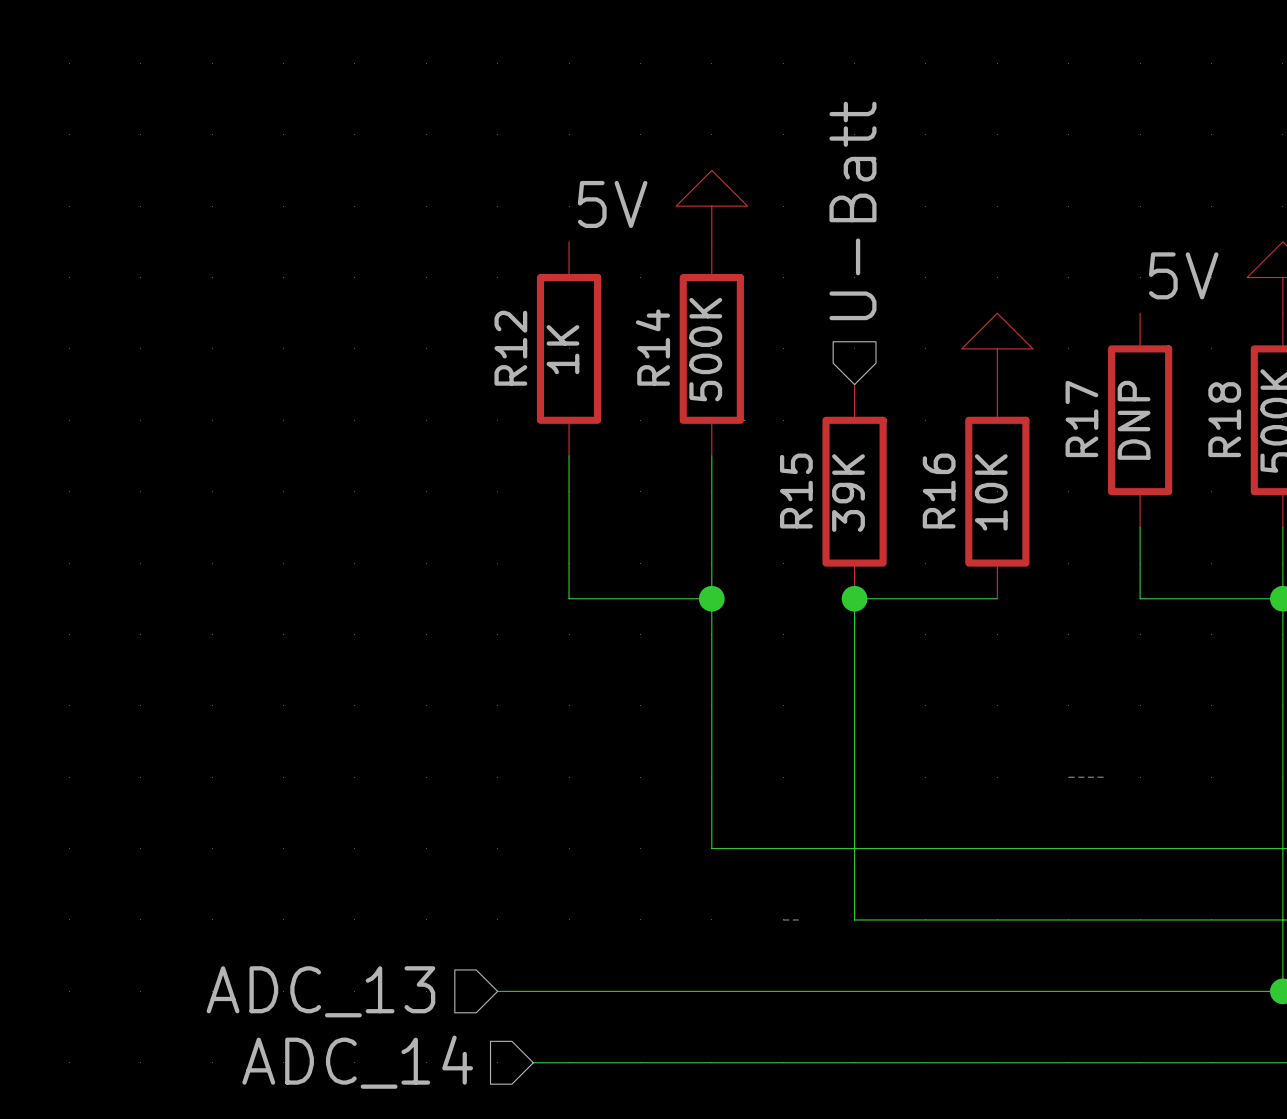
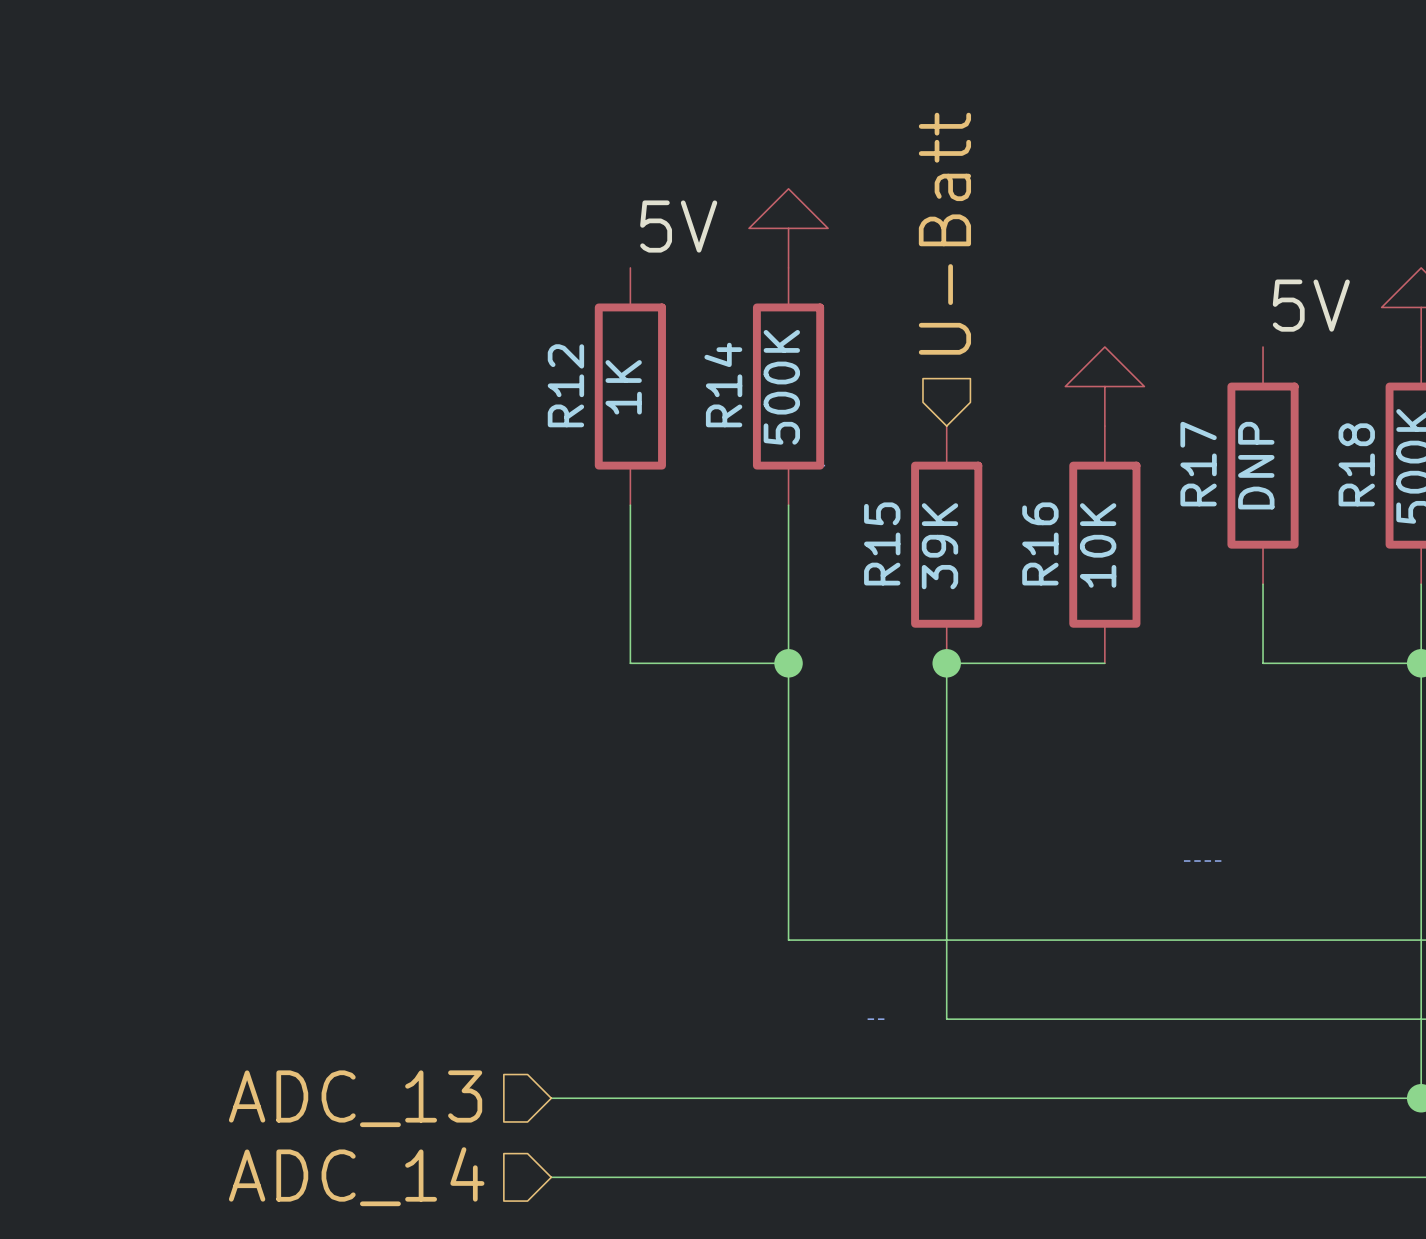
hierarchical label position: ADC_14 (357, 1062) -> ADC_14 (356, 1176)
wire: none -> (551, 1177) (590, 1177)

